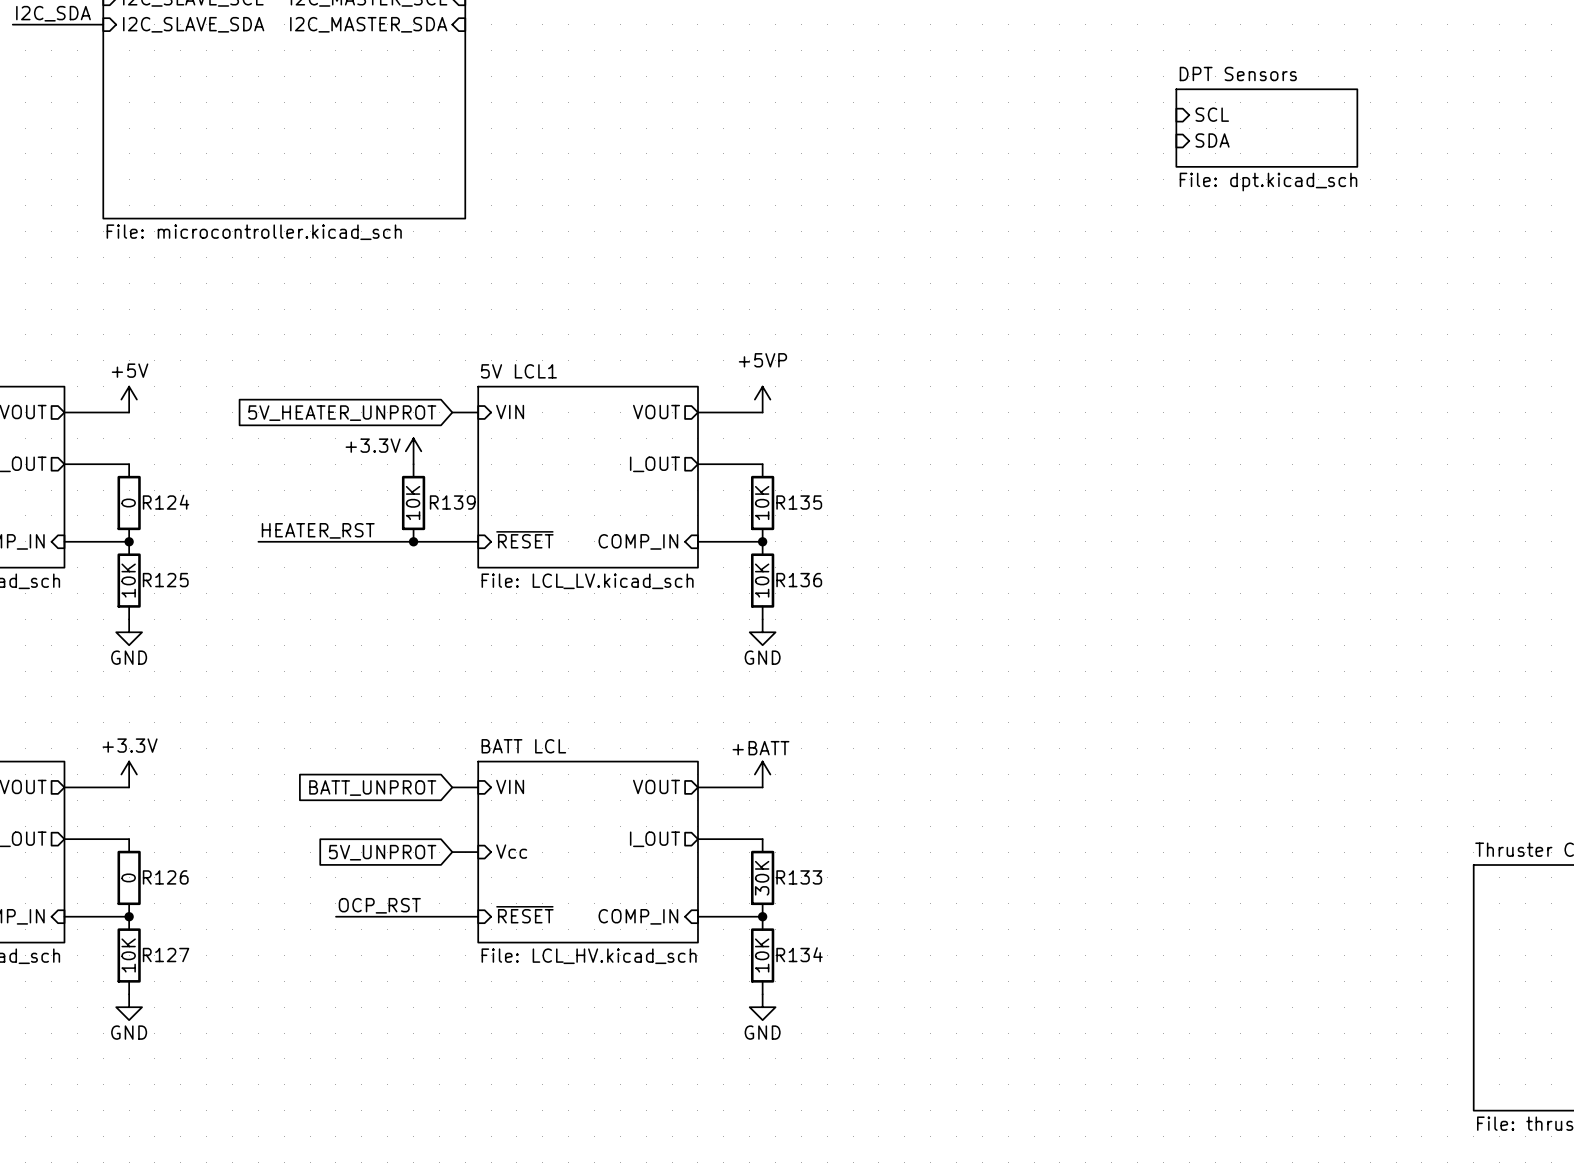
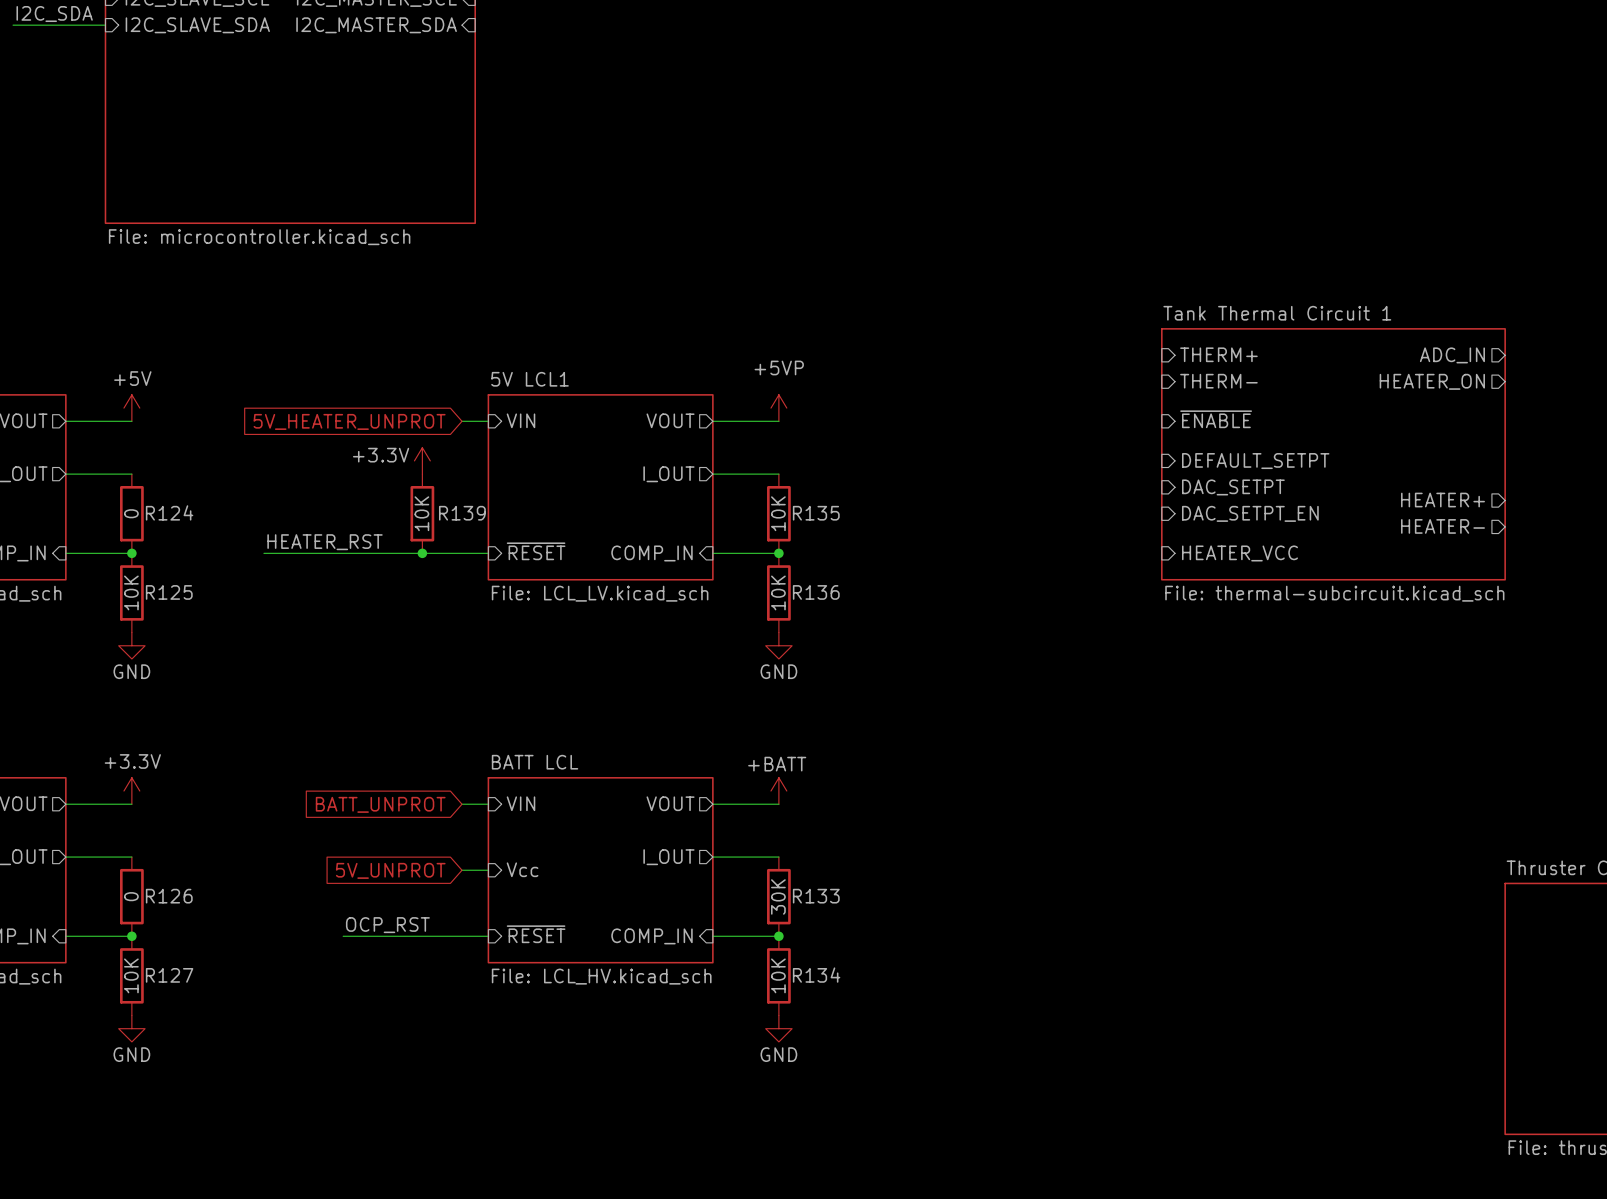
sheet pin: SCL (1212, 114) -> none
sheet DPT Sensors: File: dpt.kicad_sch (1266, 128) -> none
sheet pin: SDA (1212, 140) -> none
sheet pin: none -> THERM+ (1218, 354)
sheet pin: none -> ADC_IN (1452, 355)
sheet pin: none -> THERM- (1218, 381)
sheet pin: none -> HEATER_ON (1432, 381)
sheet pin: none -> ~{ENABLE} (1216, 419)
sheet Tank Thermal Circuit 1: none -> File: thermal-subcircuit.kicad_sch (1333, 454)
sheet pin: none -> DEFAULT_SETPT (1255, 461)
sheet pin: none -> DAC_SETPT (1233, 487)
sheet pin: none -> HEATER+ (1443, 500)
sheet pin: none -> DAC_SETPT_EN (1250, 513)
sheet pin: none -> HEATER- (1443, 526)
sheet pin: none -> HEATER_VCC (1240, 553)

